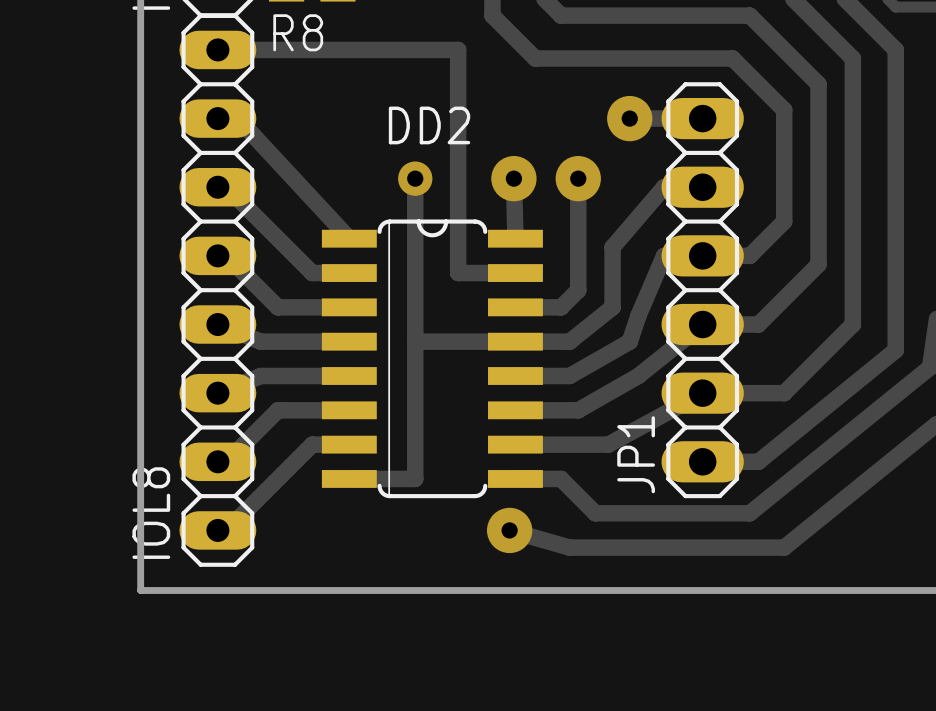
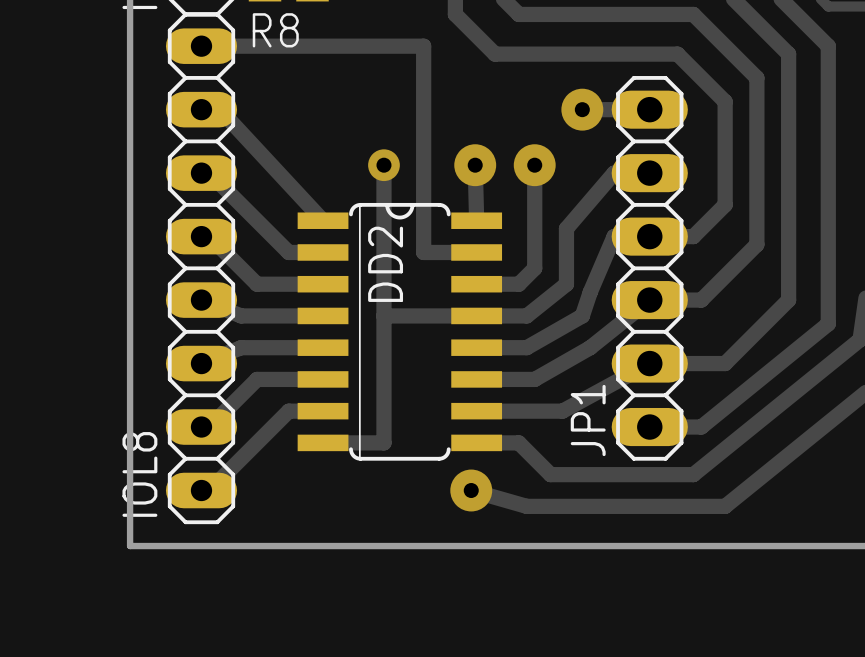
DD2 name rotation: 0° (429, 125) -> 90° counterclockwise (385, 264)
DD2 name position: DD2 (429, 125) -> DD2 (385, 264)

